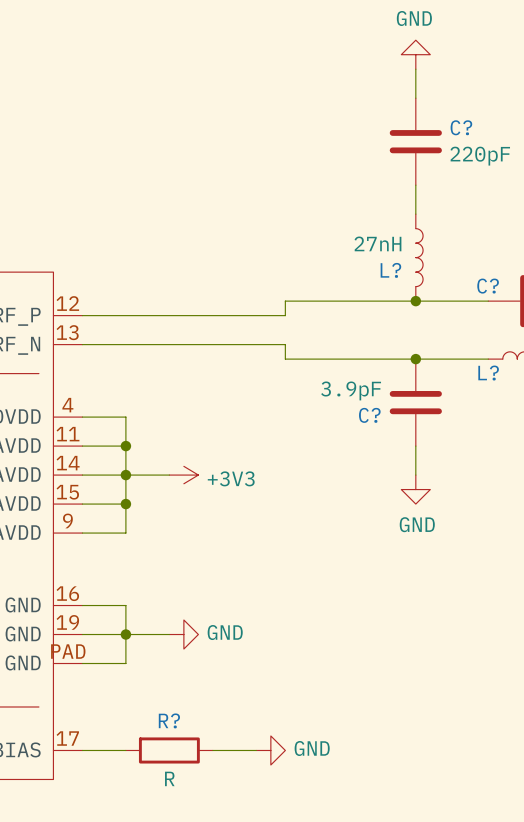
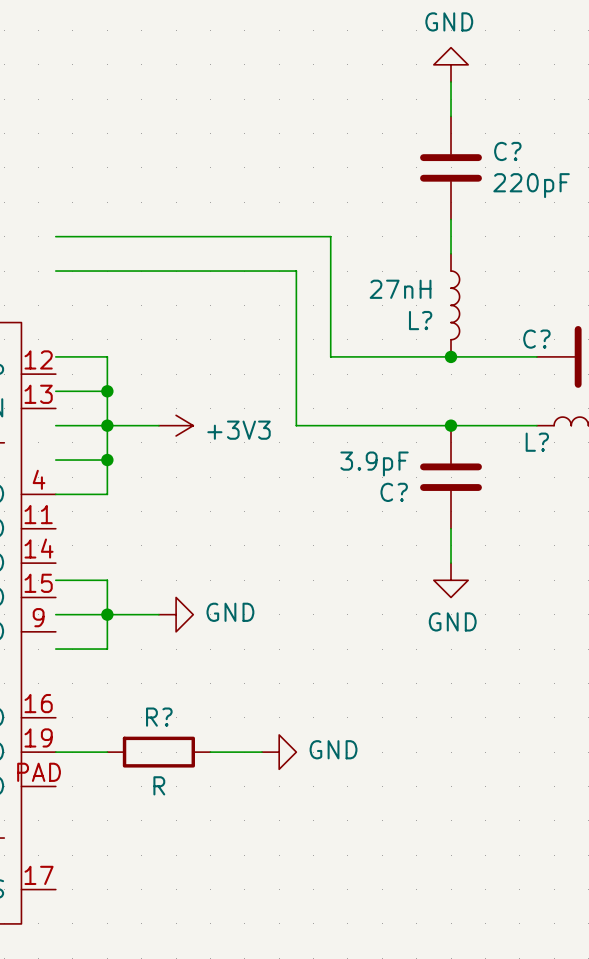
wire: none -> (55, 271) (296, 271) (296, 356)
wire: none -> (55, 356) (107, 356) (107, 494)
wire: (285, 301) (314, 301) -> (55, 236) (330, 236) (330, 356)
wire: (82, 315) (285, 315) -> (296, 408) (296, 374)
junction: none -> (107, 391)
wire: (82, 344) (285, 344) -> none
junction: none -> (107, 425)
junction: none -> (107, 460)
wire: (125, 417) (125, 489) -> (55, 580) (107, 580)
wire: (82, 446) (125, 446) -> (55, 391) (107, 391)
junction: (125, 446) -> none
wire: (82, 475) (169, 475) -> (55, 425) (158, 425)
junction: (125, 475) -> none
power symbol position: +3V3 (183, 475) -> +3V3 (176, 425)
wire: (82, 504) (125, 504) -> (55, 460) (107, 460)
junction position: (125, 504) -> (107, 614)
wire: none -> (55, 614) (158, 614)
power symbol: none -> GND (176, 614)
wire: (82, 533) (125, 533) -> (55, 649) (107, 649) (107, 631)
wire: (82, 605) (125, 605) (125, 663) (82, 663) -> none
wire: (125, 634) (169, 634) -> none
junction: (125, 634) -> none
power symbol: GND (183, 634) -> none
power symbol: none -> GND (279, 752)
wire: (82, 750) (125, 750) -> none
R? position: (169, 750) -> (158, 752)
wire: (212, 750) (256, 750) -> (210, 752) (262, 752)
power symbol: GND (270, 750) -> none

